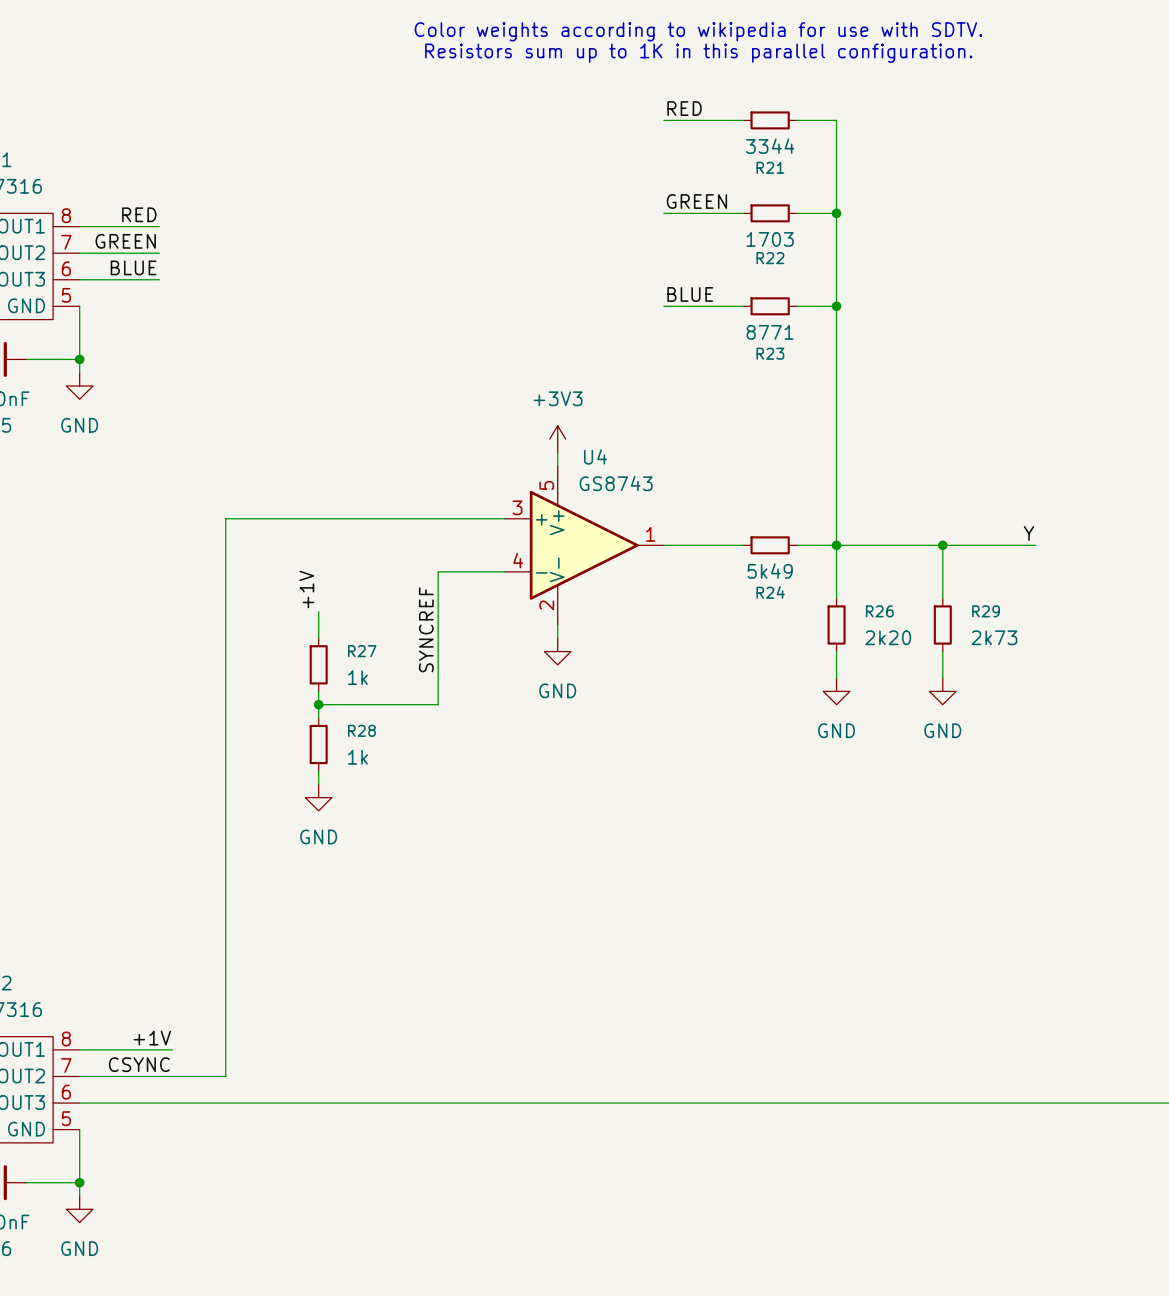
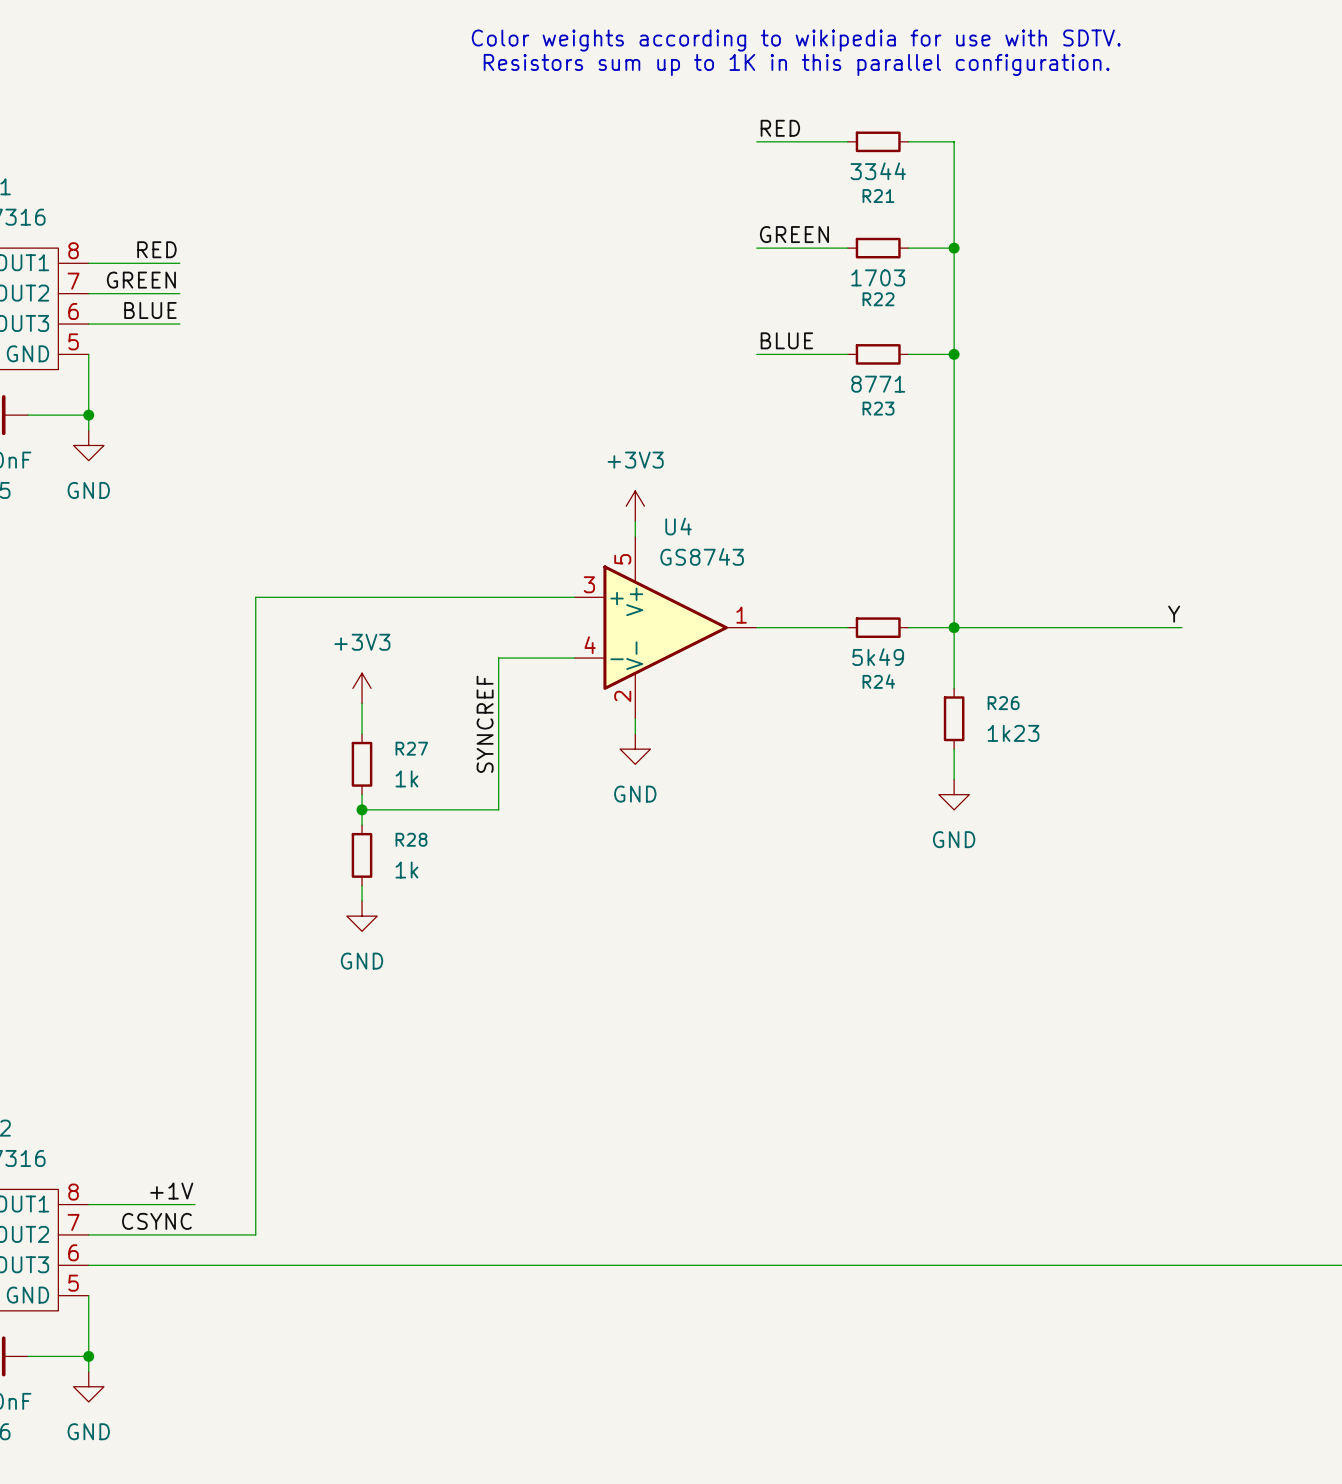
wire: (942, 545) (942, 598) -> none
junction: (942, 545) -> none
label: +1V (306, 589) -> none
power symbol: none -> +3V3 (362, 688)
R29: 2k73 (942, 625) -> none
R26 value: 2k20 (888, 637) -> 1k23 (1013, 733)
wire: (942, 651) (942, 678) -> none
power symbol: GND (942, 691) -> none

